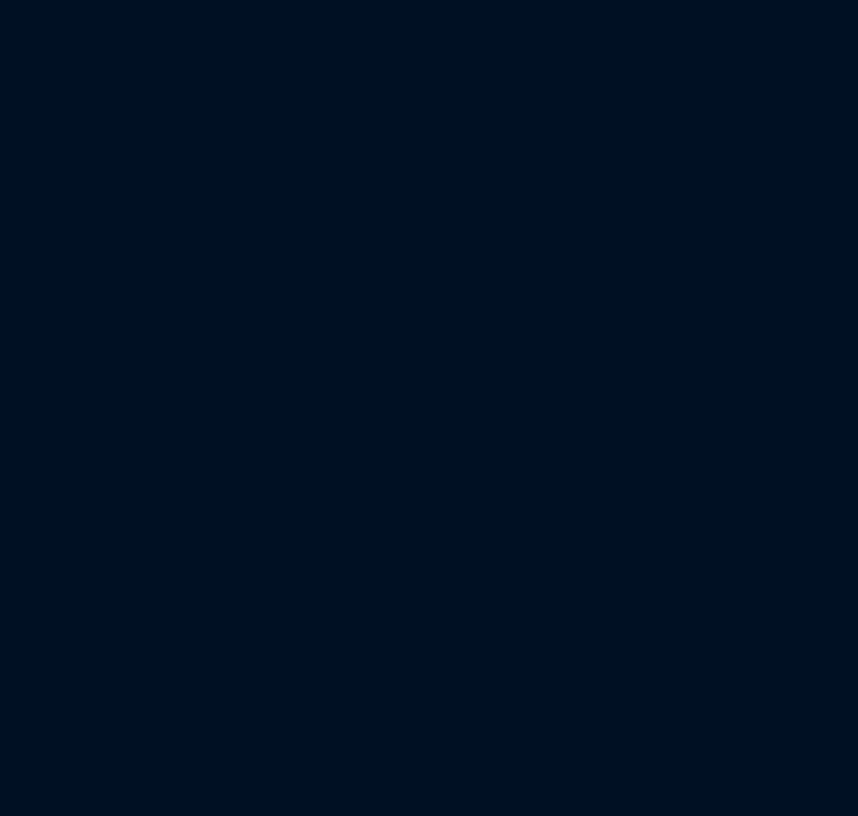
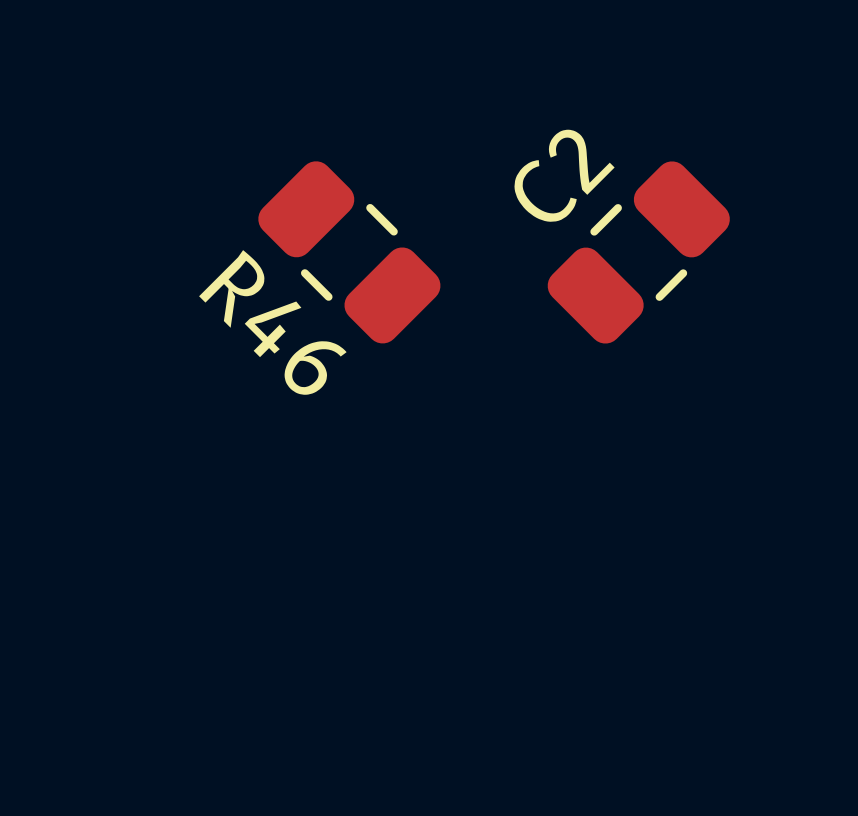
R46: none -> (349, 252)
C2: none -> (638, 252)

